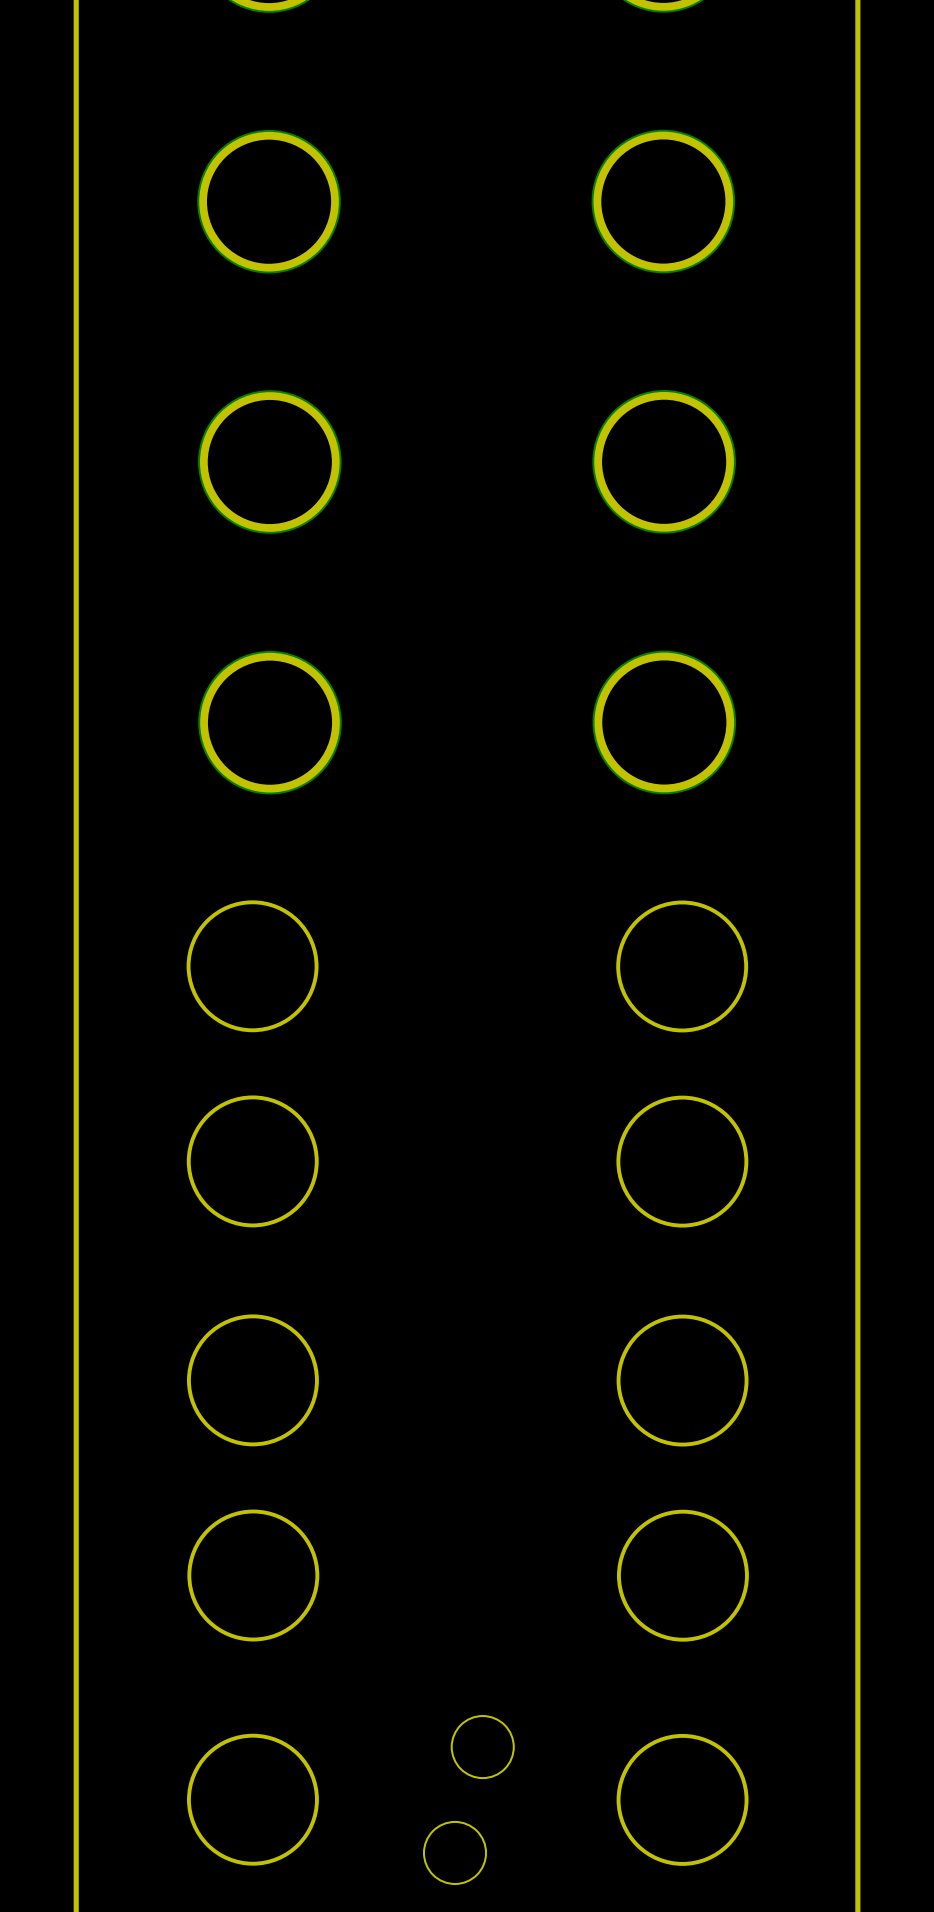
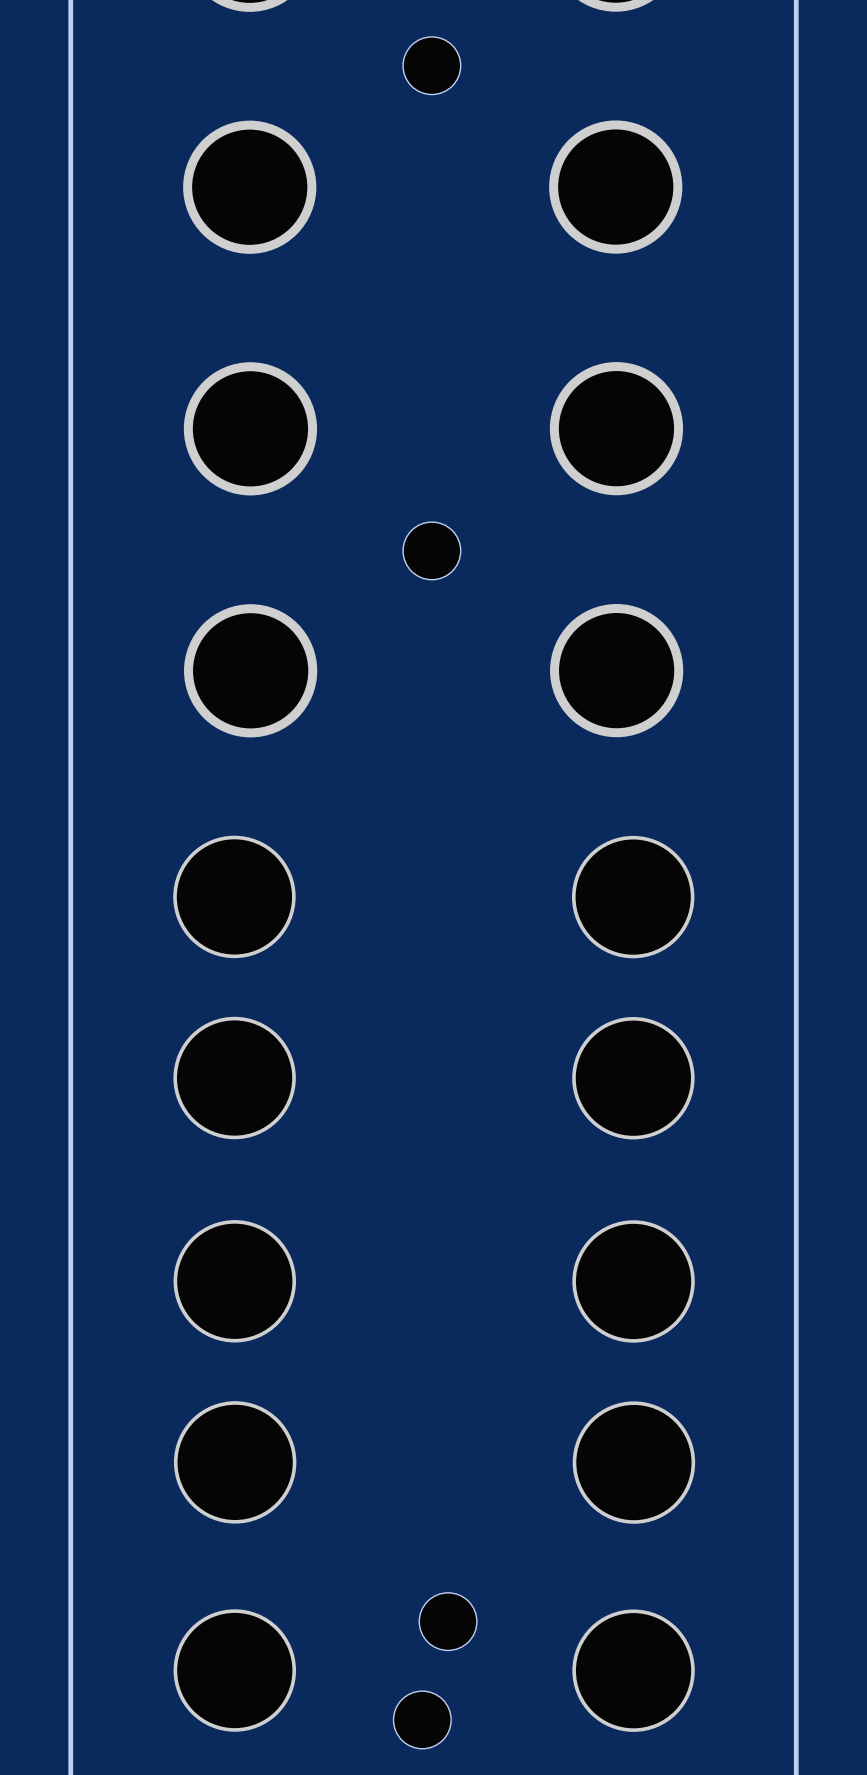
part: none -> (431, 65)
part: none -> (431, 550)

